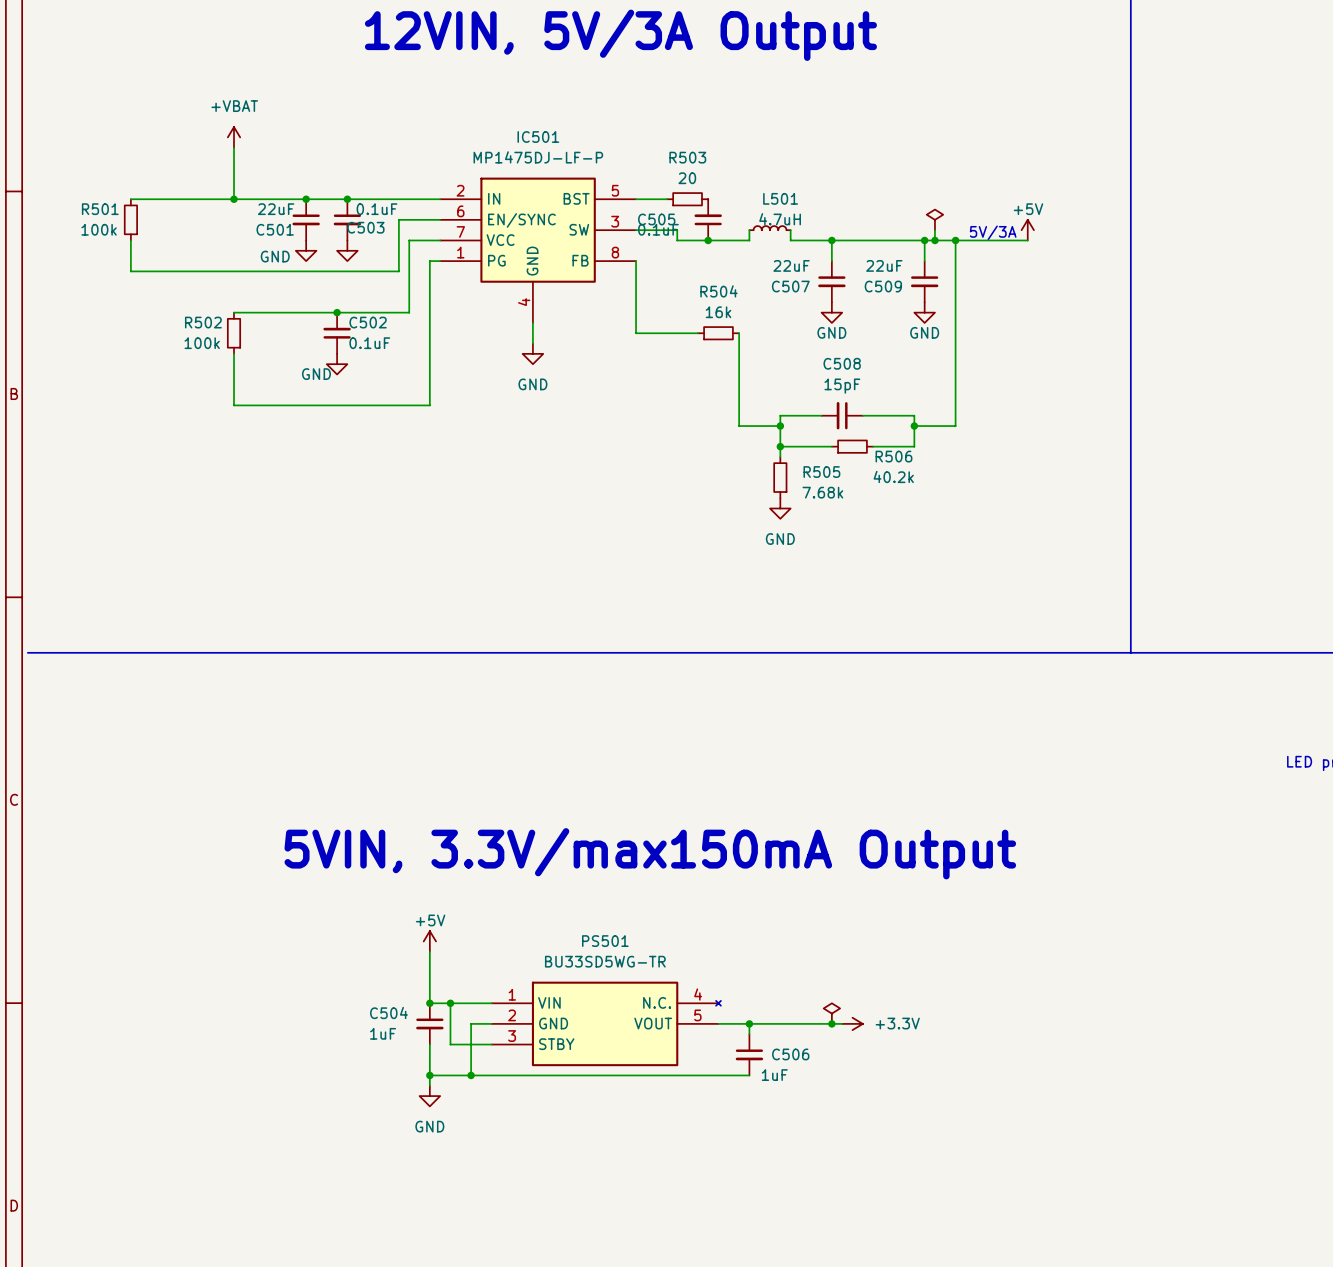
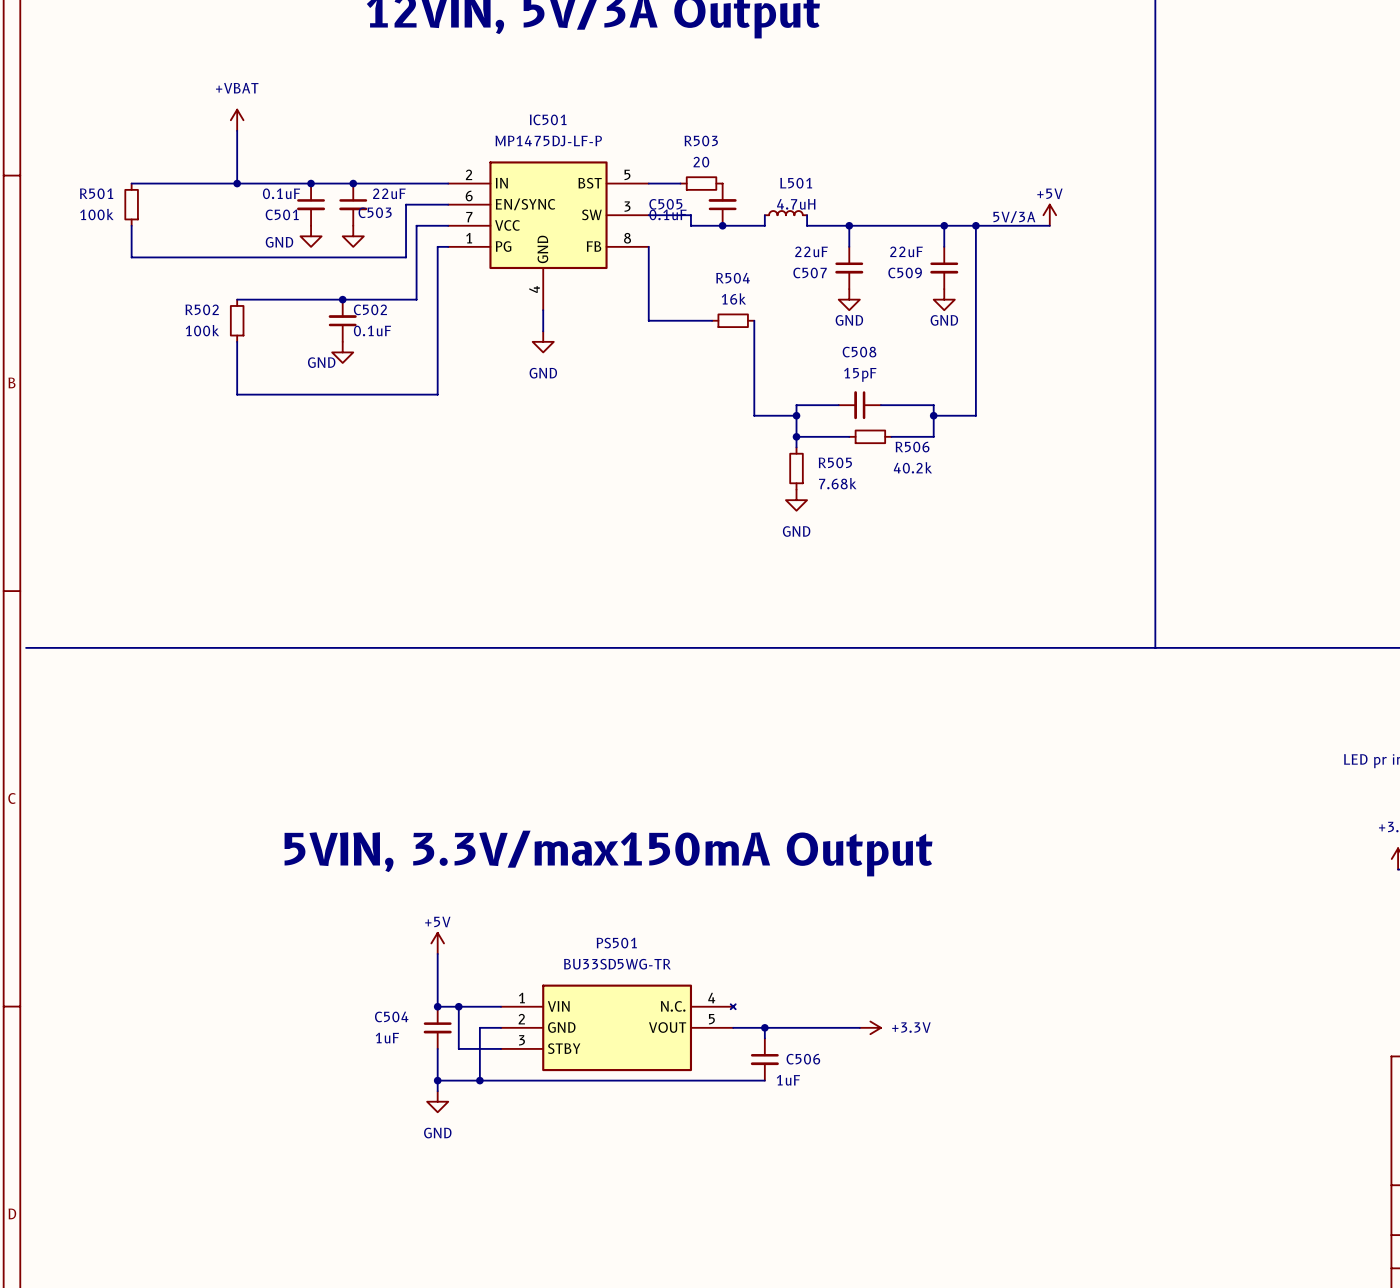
C501 value: 22uF (276, 209) -> 0.1uF (281, 193)
C503 value: 0.1uF (377, 209) -> 22uF (389, 193)
power symbol: (934, 219) -> none
wire: (934, 230) (934, 240) -> none
junction: (934, 240) -> none
power symbol: (831, 1013) -> none
junction: (831, 1023) -> none

